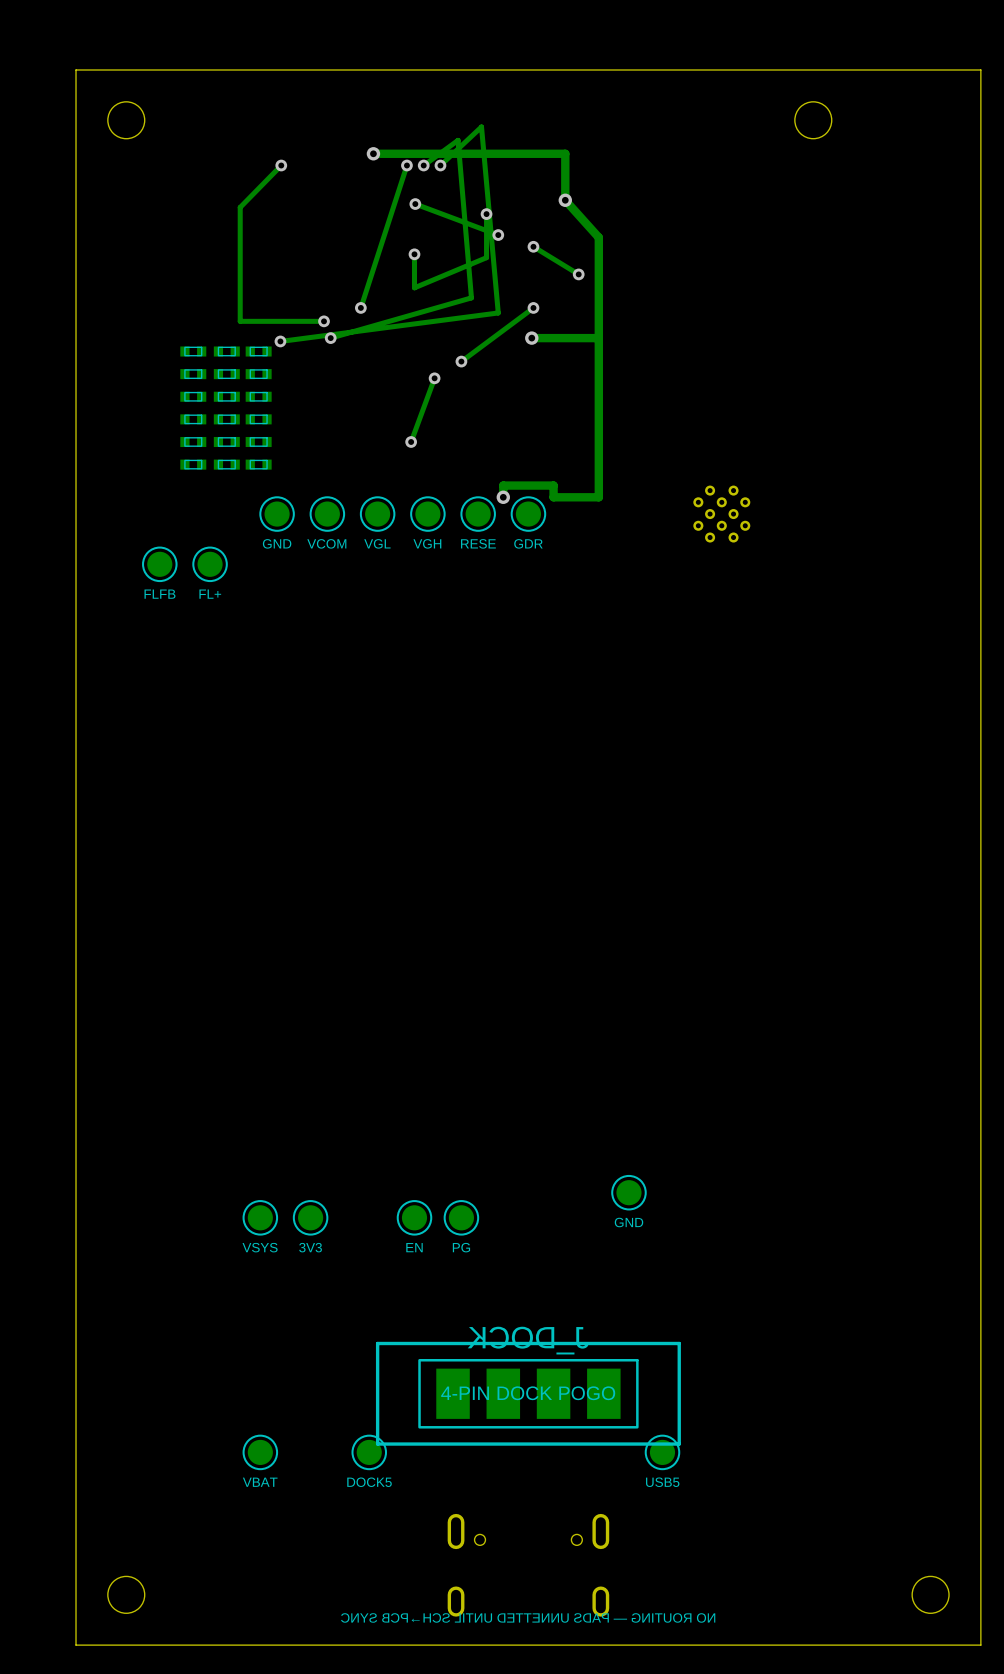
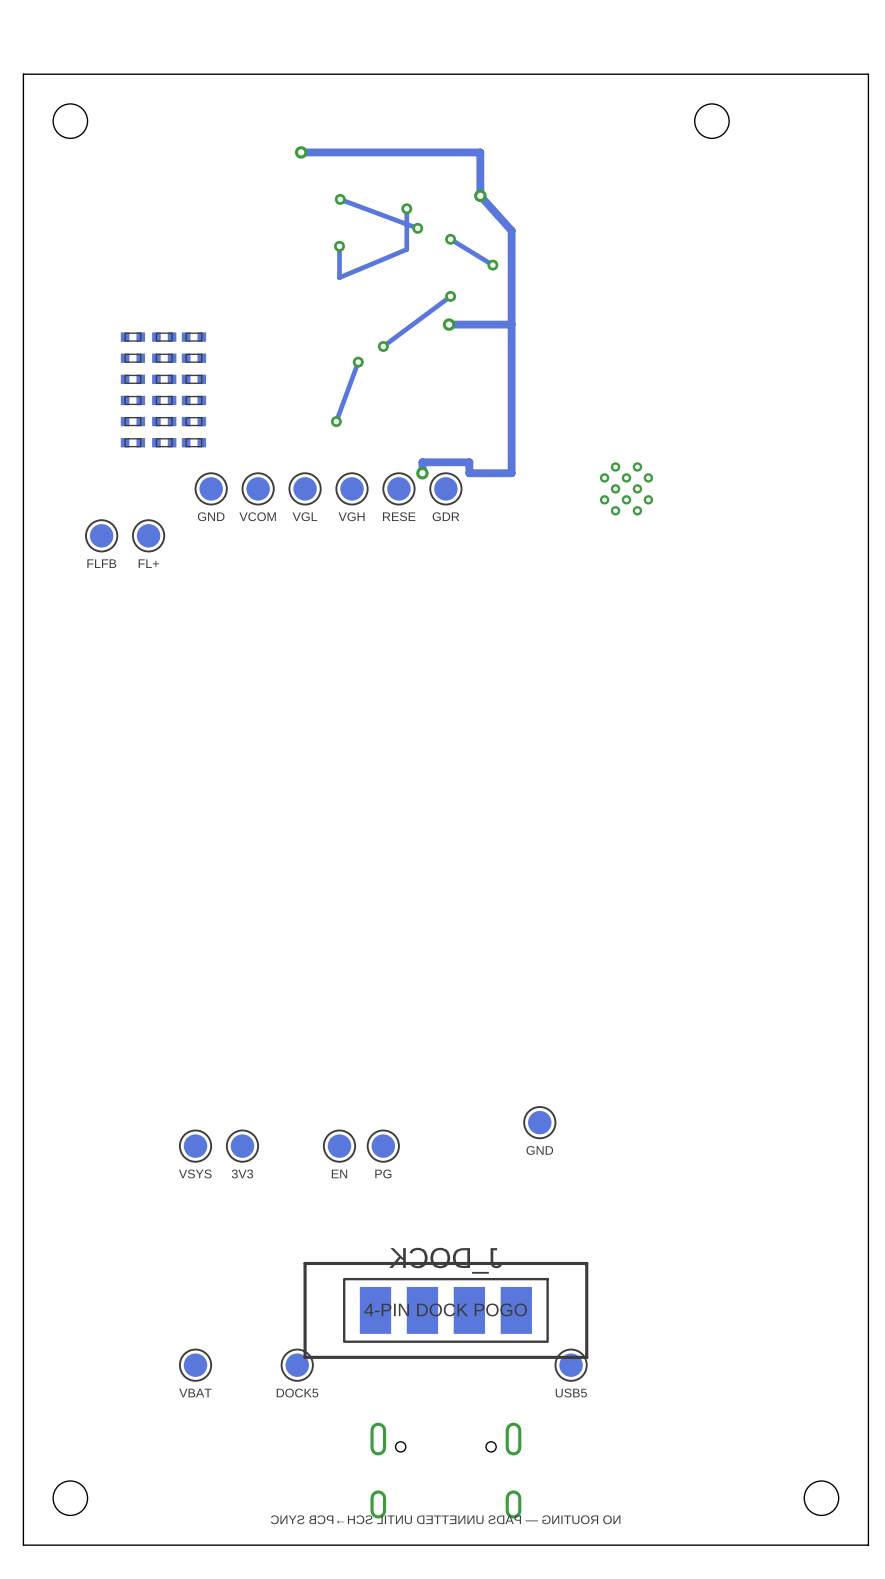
track: (281, 165) (240, 207) (240, 321) (324, 321) -> none
via: (281, 165) -> none
track: (406, 165) (360, 307) -> none
via: (406, 165) -> none
track: (423, 165) (458, 140) (471, 297) (330, 338) -> none
via: (423, 165) -> none
track: (440, 165) (481, 126) (498, 312) (280, 341) -> none
via: (440, 165) -> none
via: (360, 307) -> none
via: (324, 321) -> none
via: (330, 338) -> none
via: (280, 341) -> none

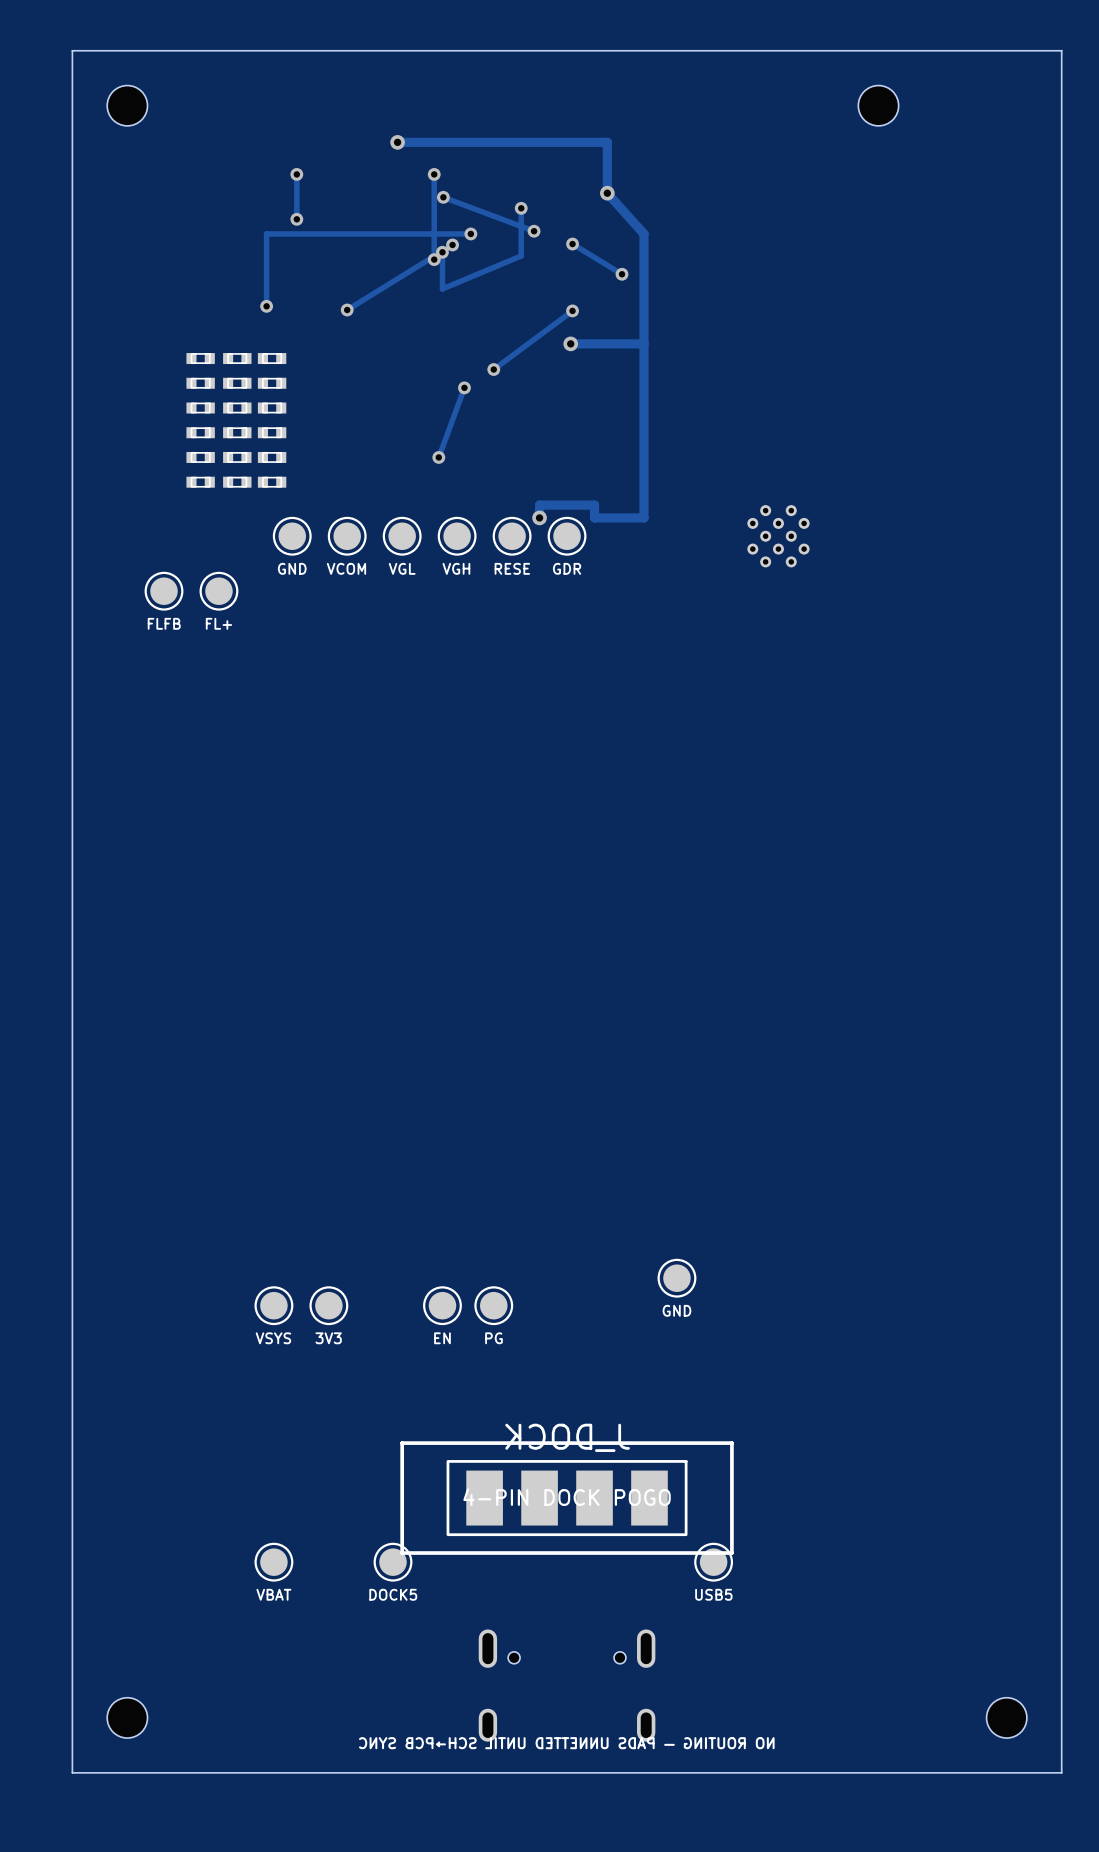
track: none -> (296, 174) (296, 219)
via: none -> (296, 174)
track: none -> (434, 174) (434, 259)
via: none -> (434, 174)
via: none -> (296, 219)
track: none -> (470, 233) (266, 233) (266, 306)
via: none -> (470, 233)
track: none -> (452, 244) (347, 309)
via: none -> (452, 244)
via: none -> (434, 259)
via: none -> (266, 306)
via: none -> (347, 309)

